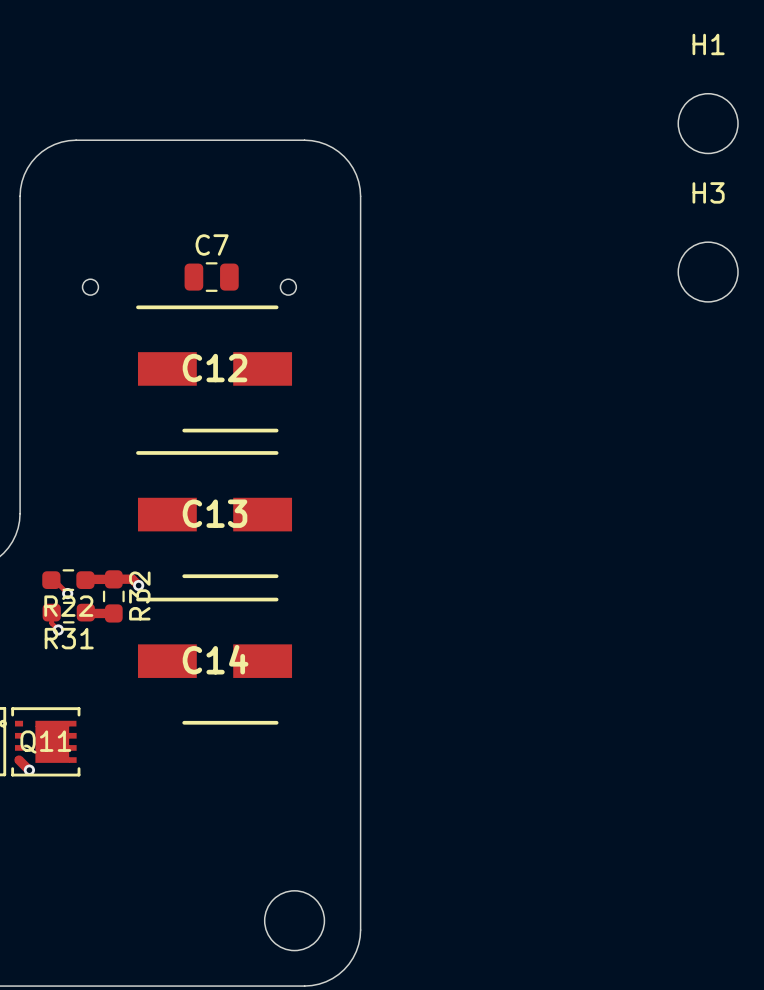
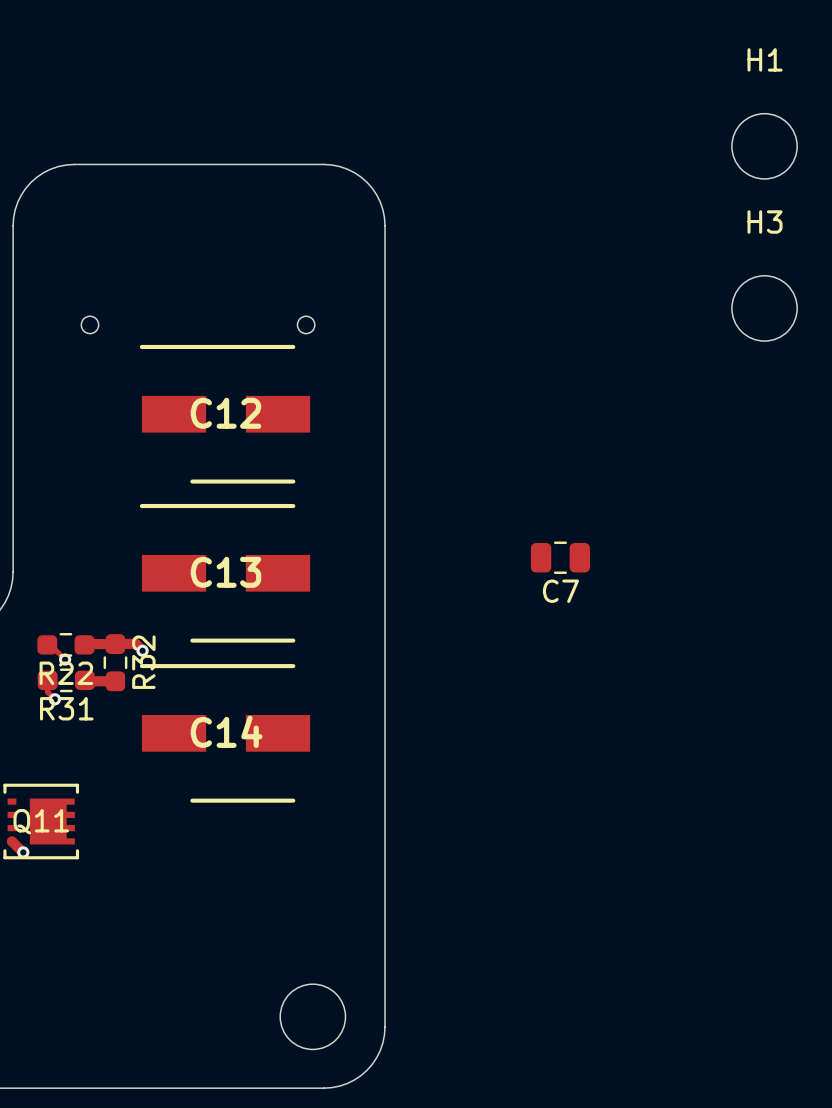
C7 name position: C7 (212, 245) -> C7 (560, 591)
C7 position: (211, 277) -> (560, 557)

